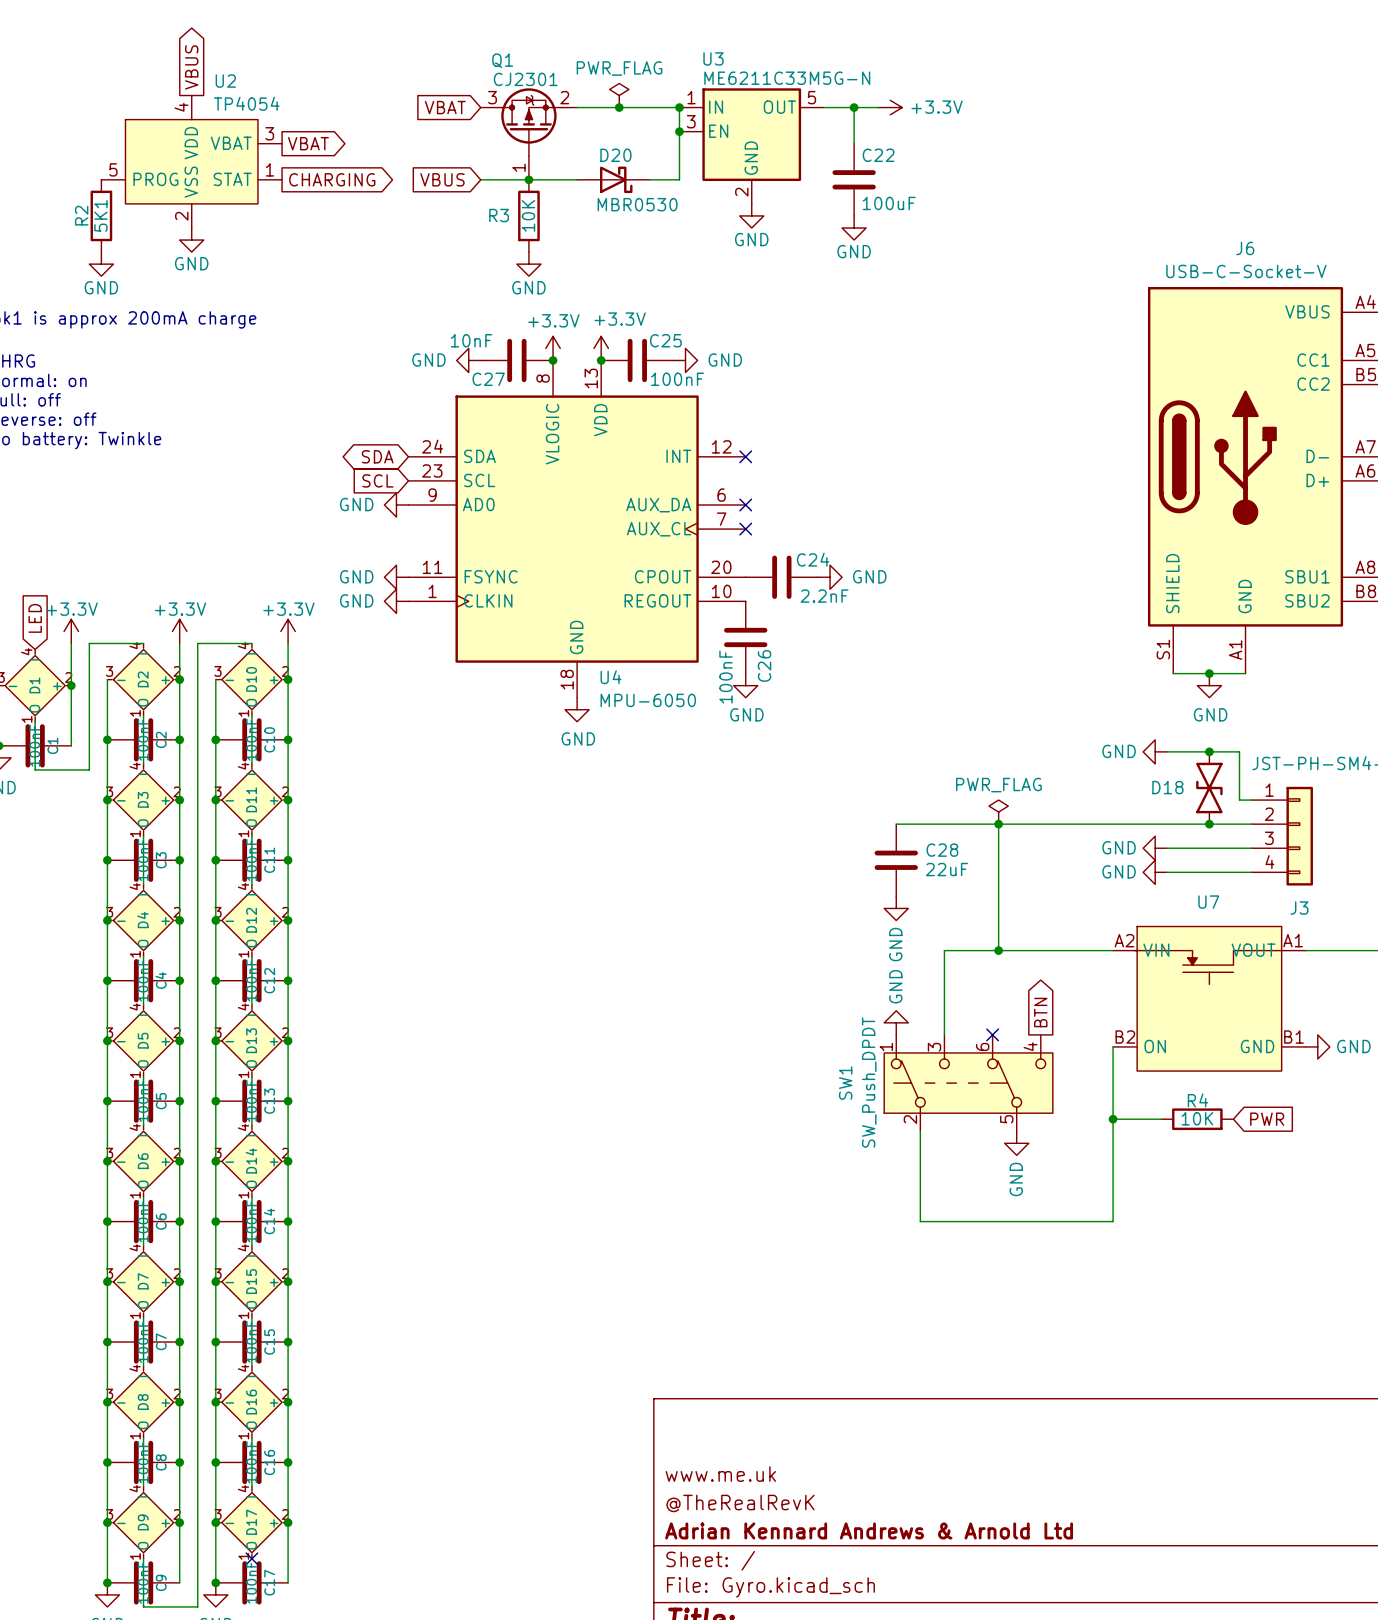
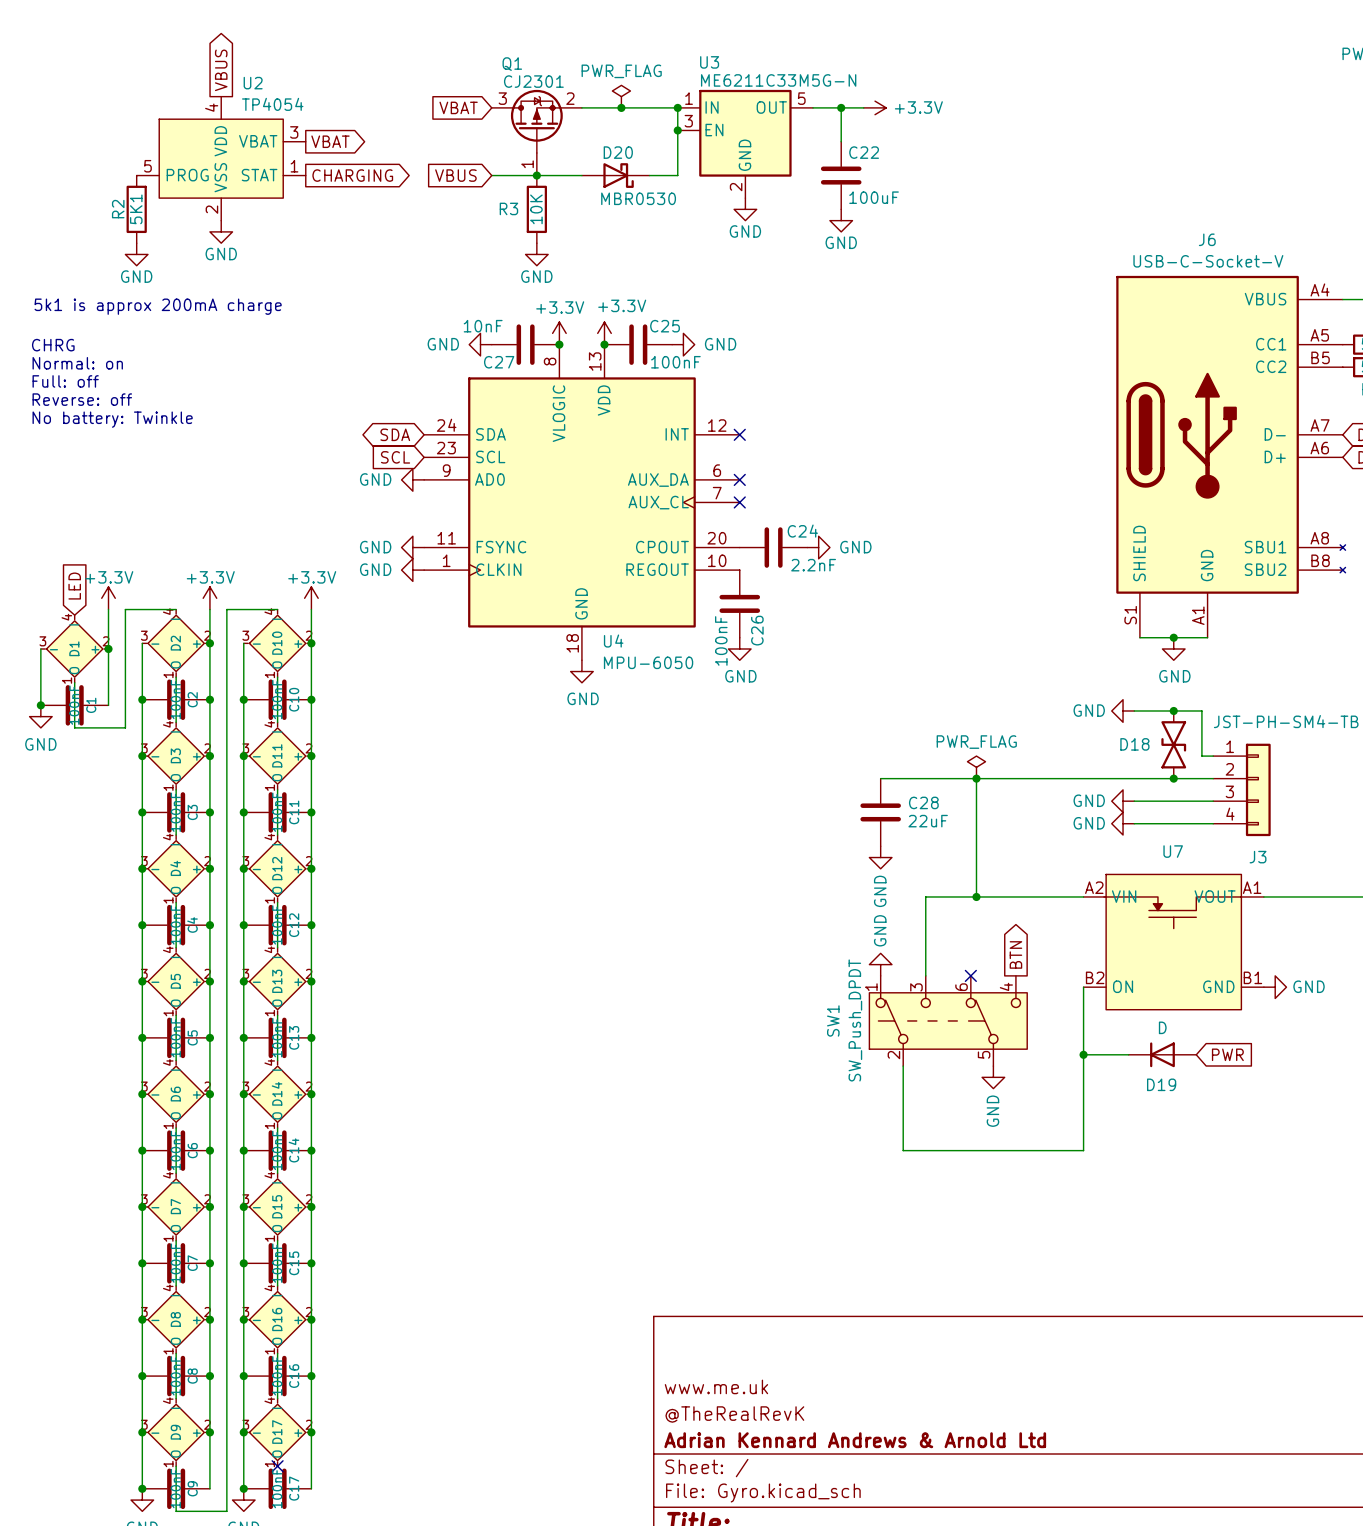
R4: 10K (1197, 1119) -> none
D19: none -> D (1162, 1054)

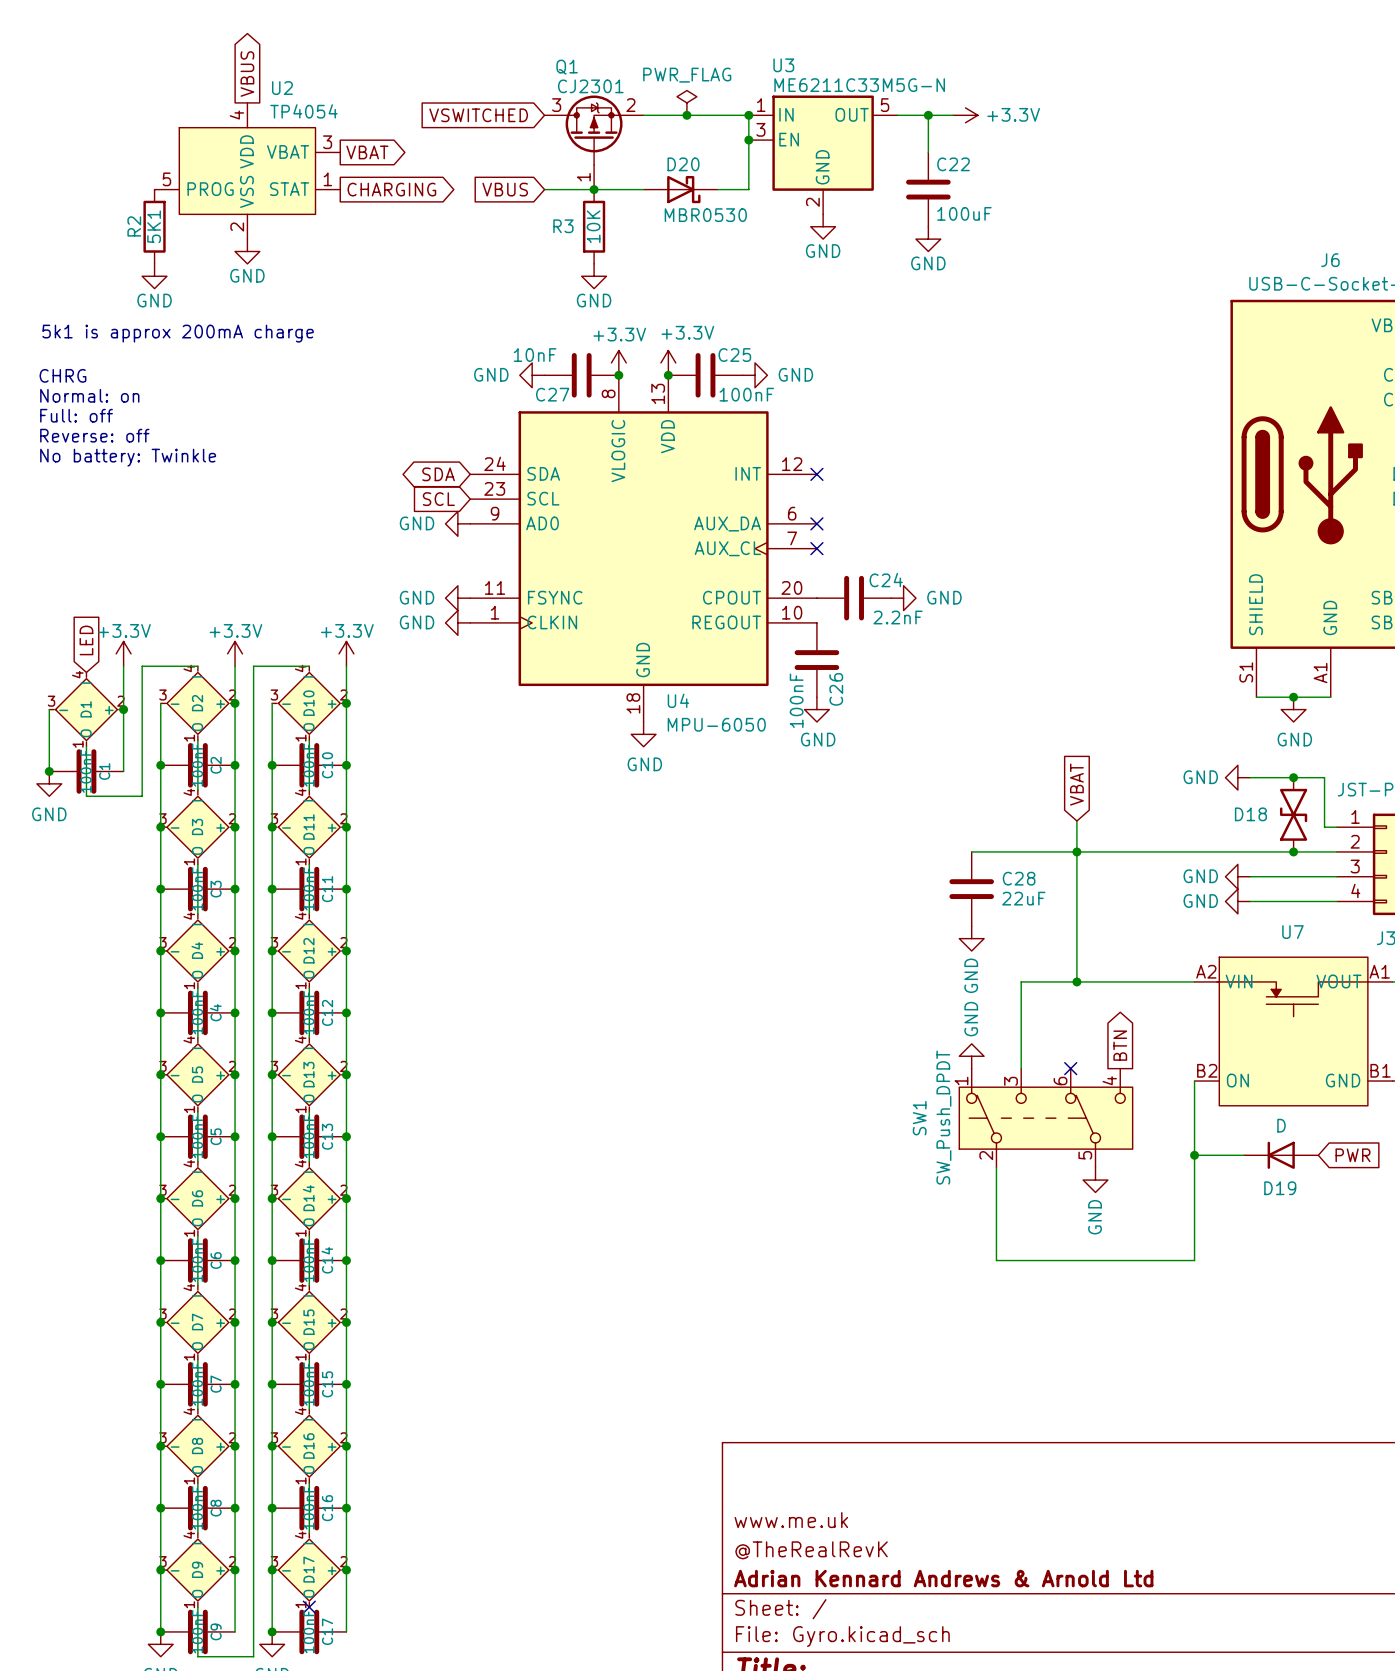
global label: VBAT (458, 107) -> VSWITCHED (478, 115)
global label: none -> VBAT (1076, 784)
wire: none -> (1076, 821) (1076, 851)
power symbol: PWR_FLAG (976, 767) -> none

